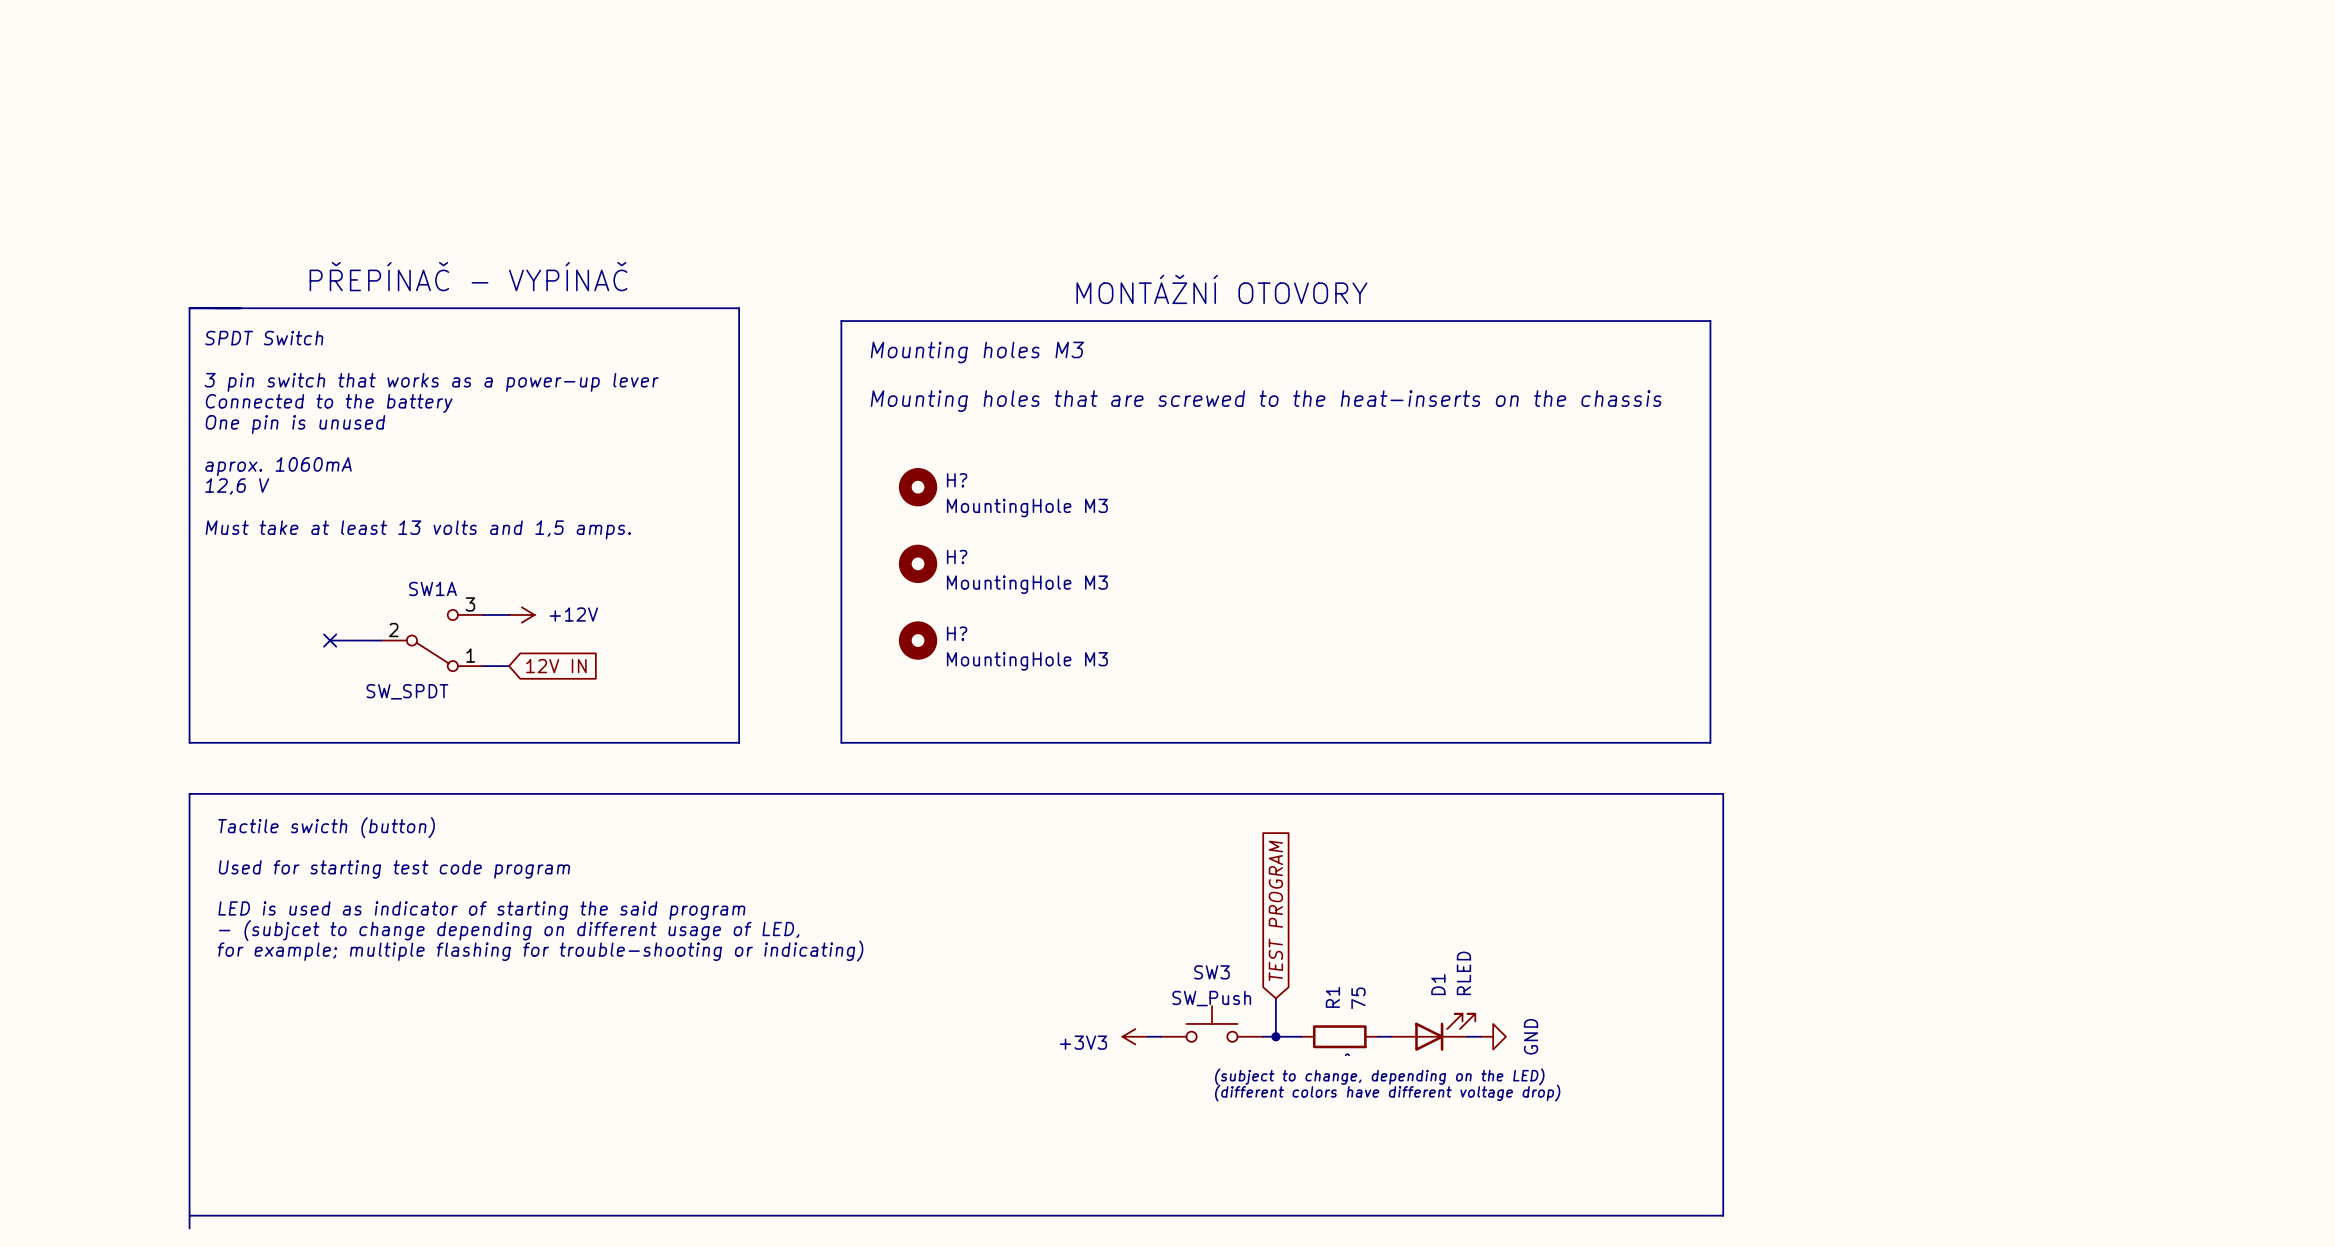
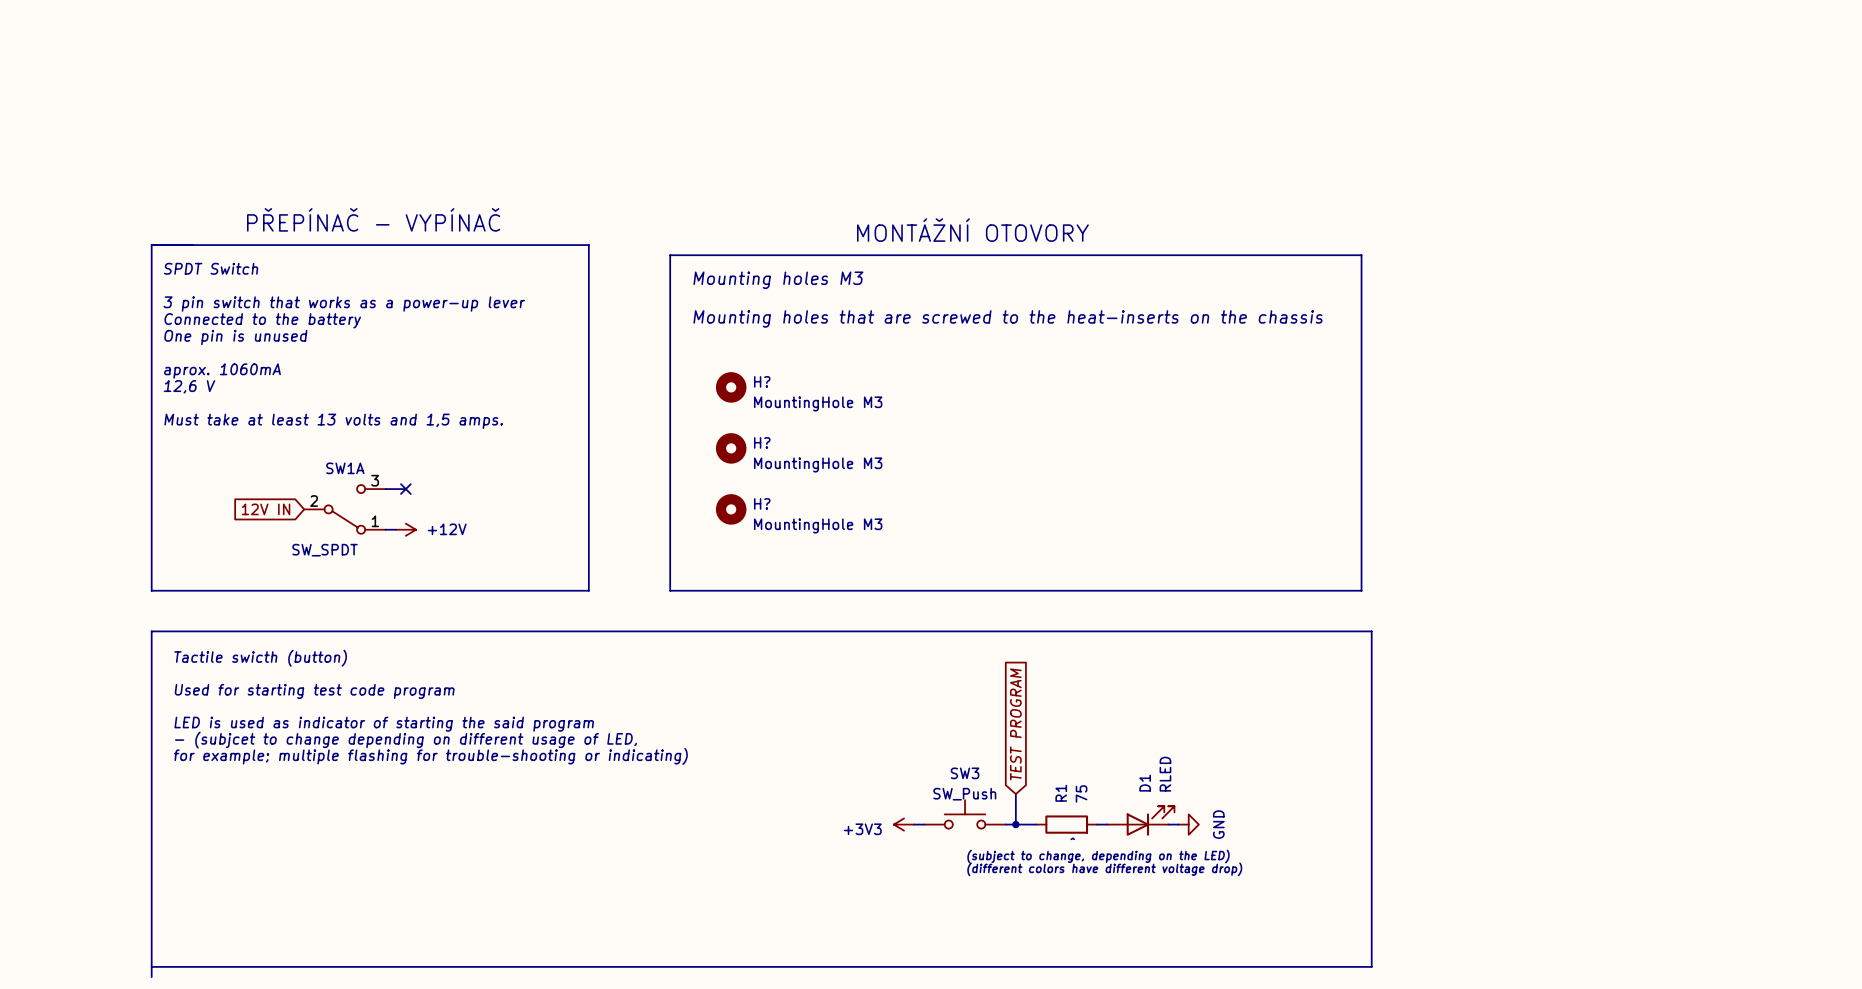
no-connect mark: none -> (405, 489)
power symbol position: +12V (521, 614) -> +12V (405, 529)
wire: (330, 640) (381, 640) -> none
no-connect mark: (330, 640) -> none
global label rotation: 0° (556, 666) -> 180° (266, 509)
global label position: 12V IN (556, 666) -> 12V IN (266, 509)

